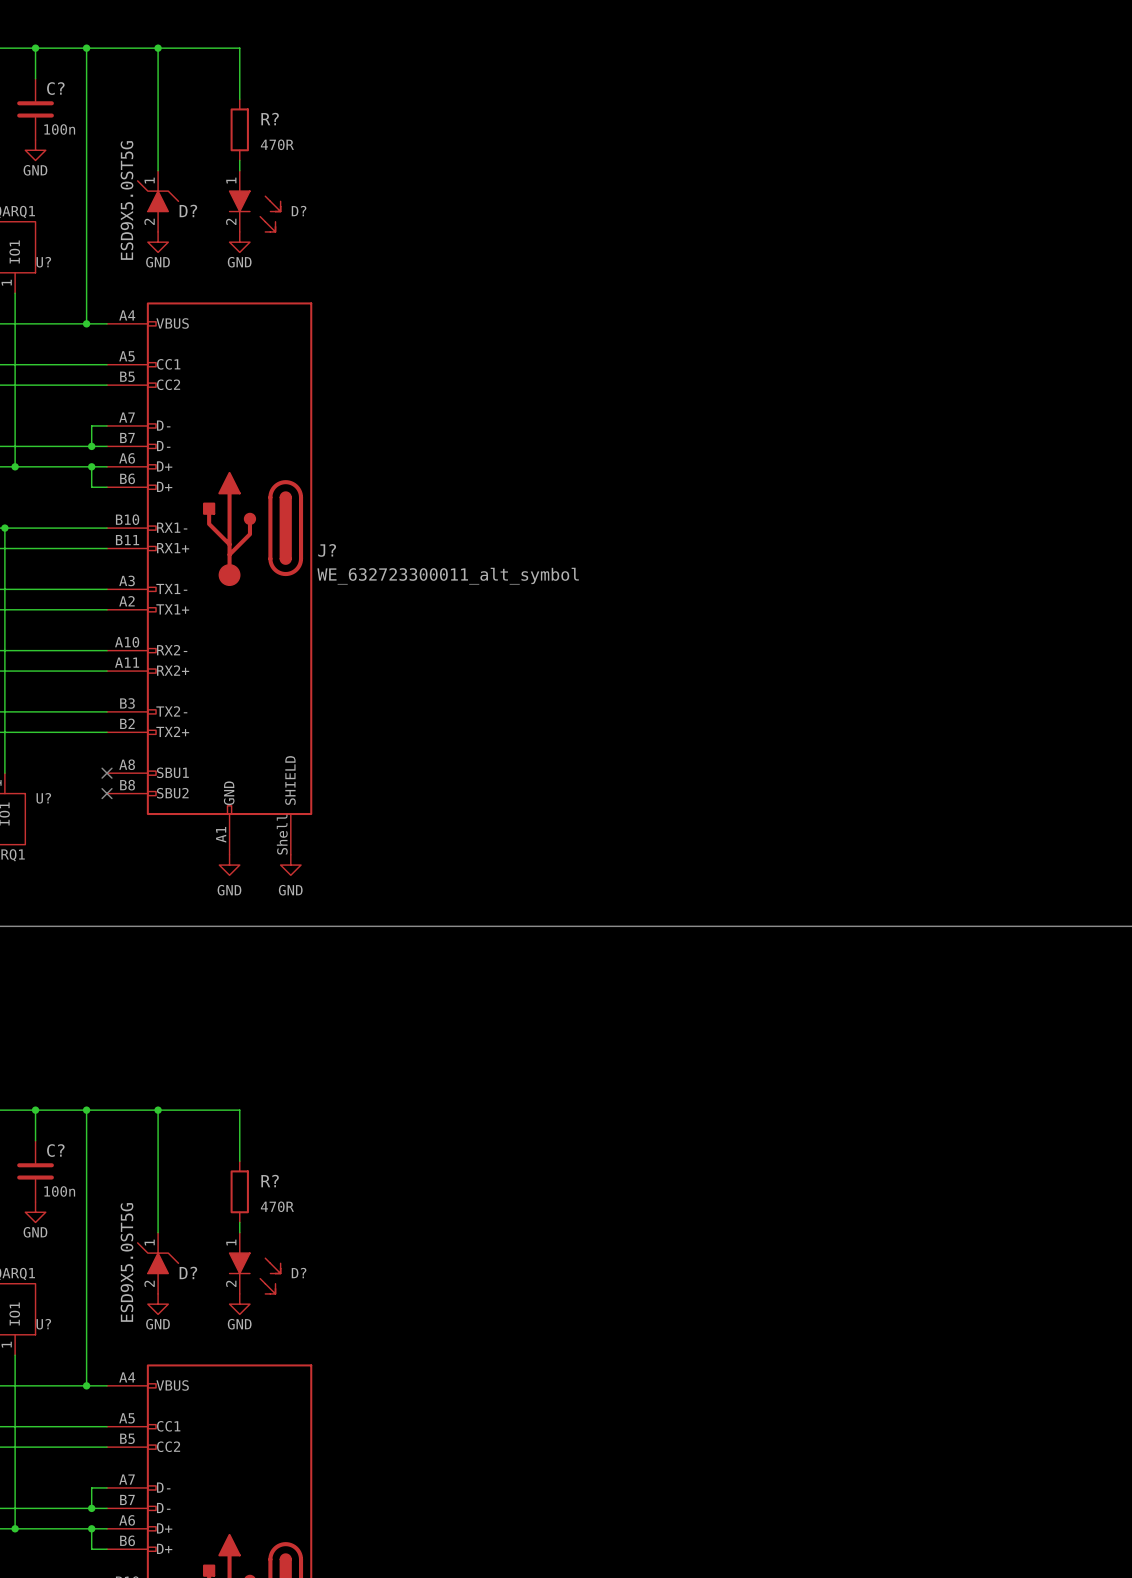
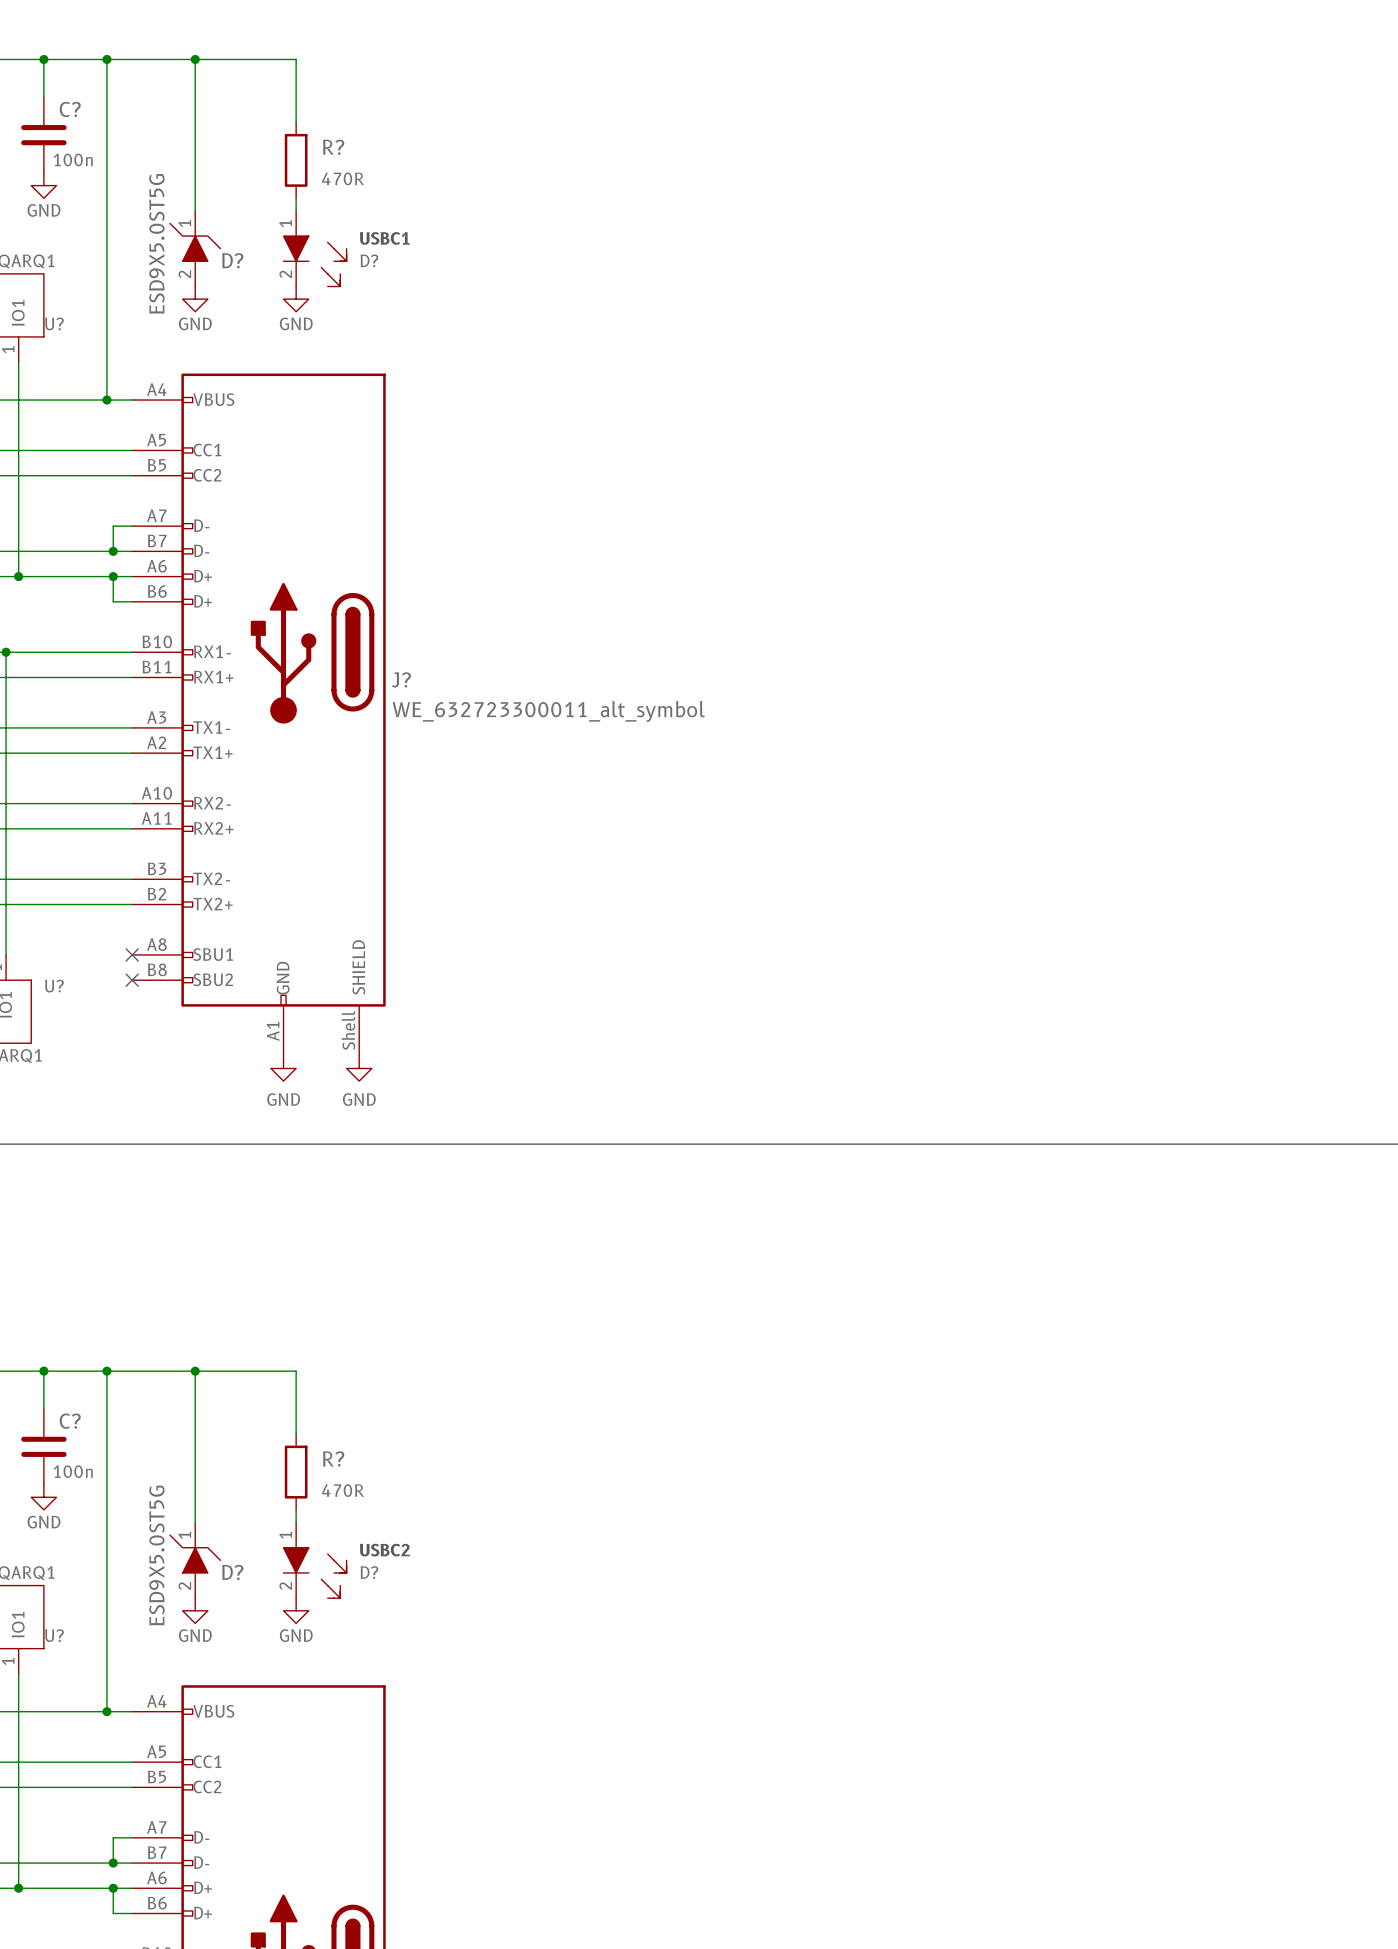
text: none -> USBC1 (384, 238)
text: none -> USBC2 (384, 1550)

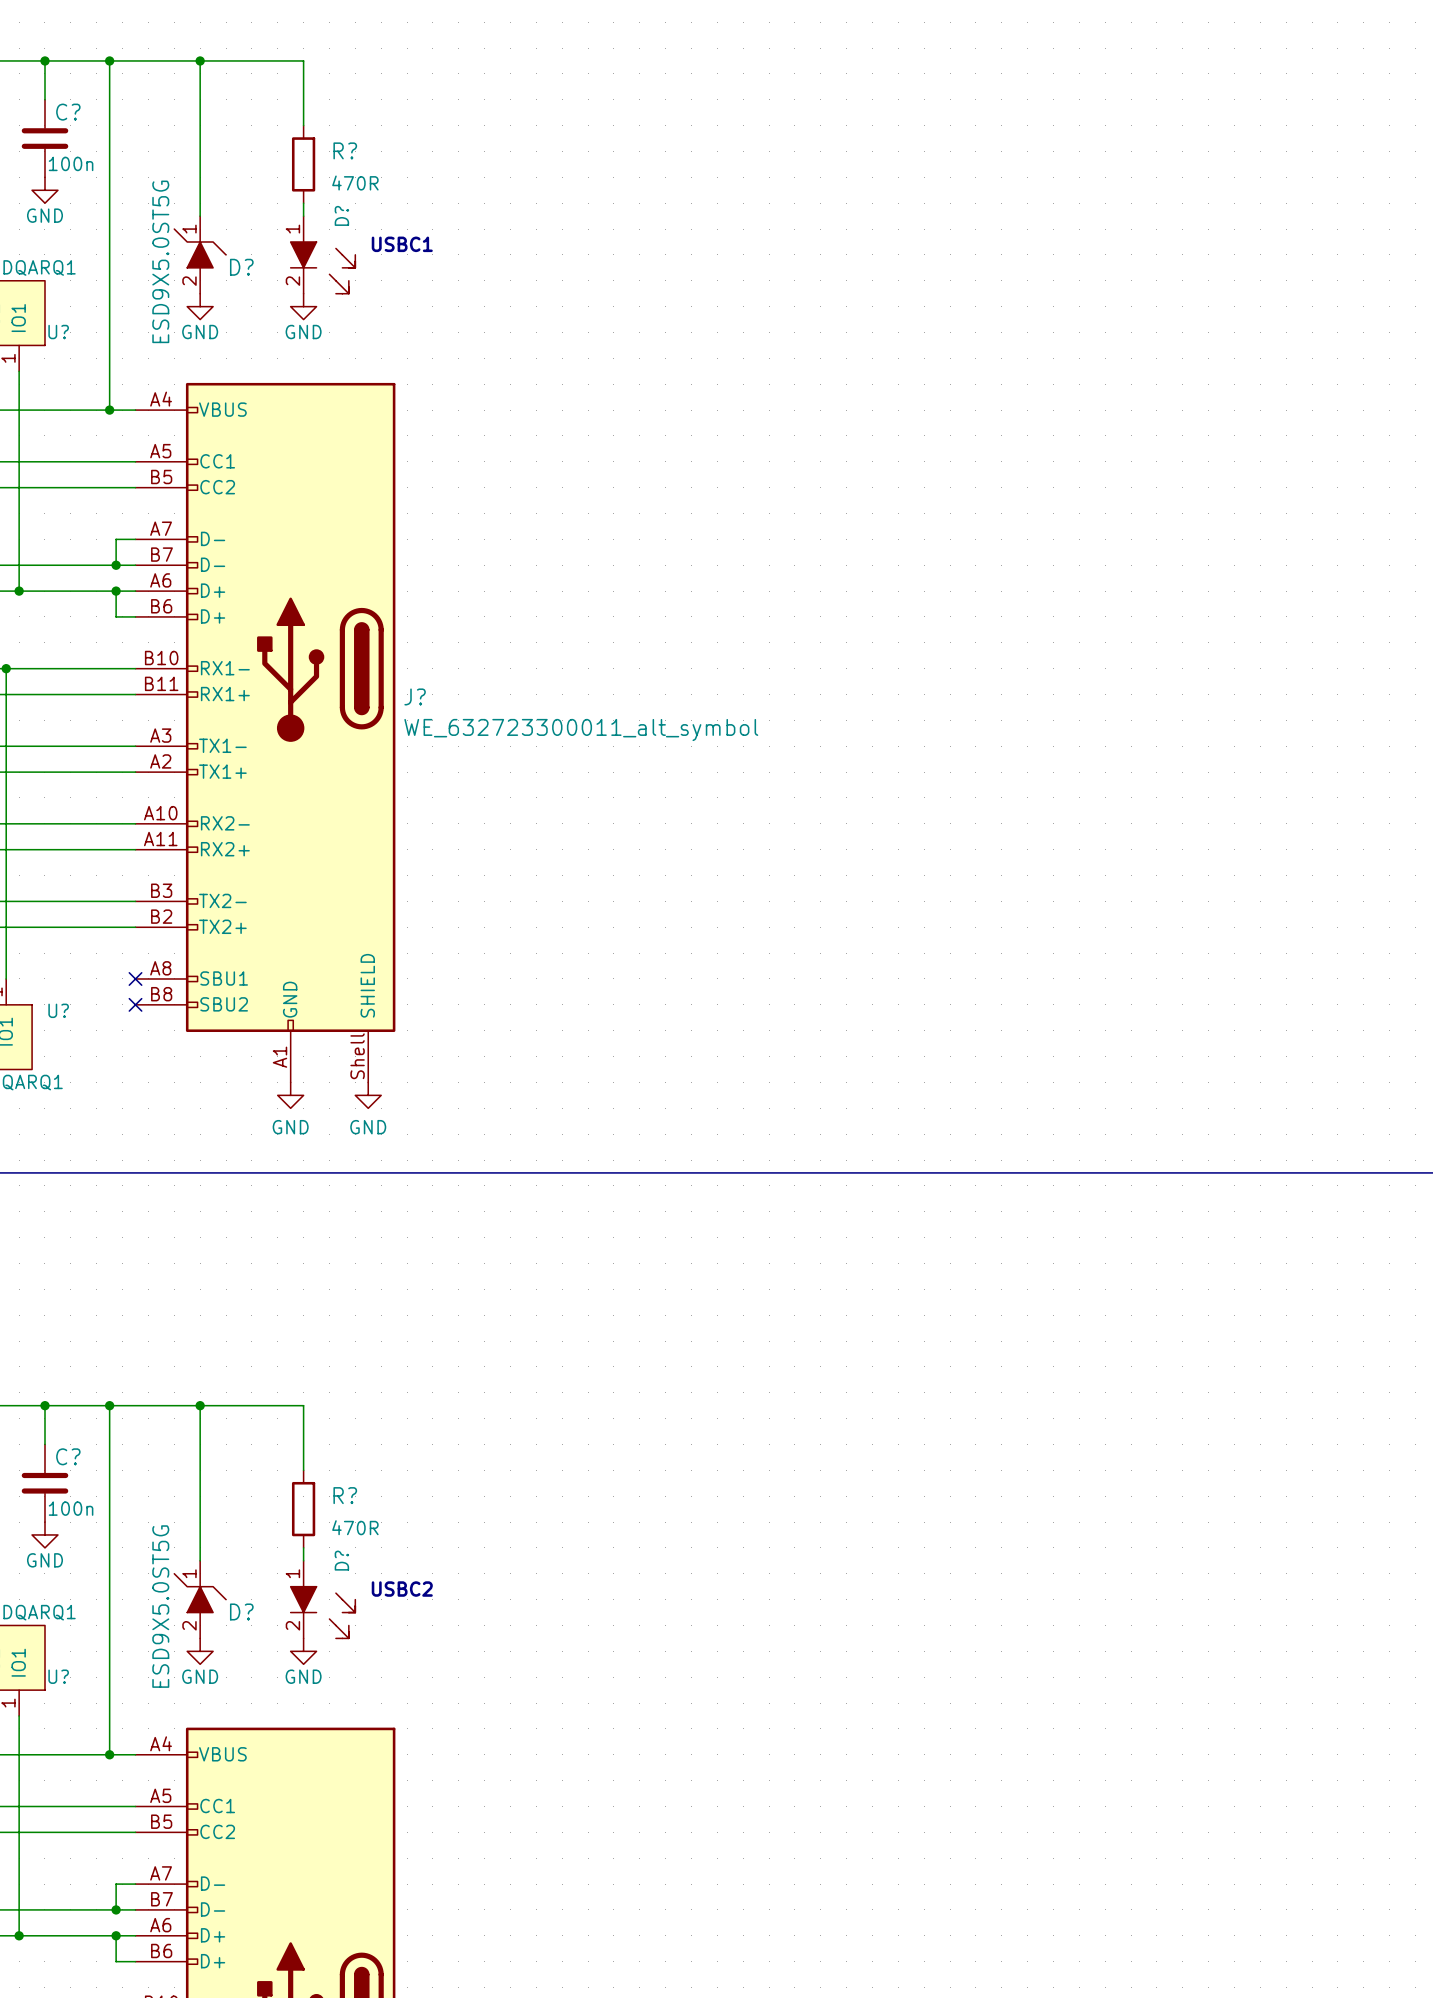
D? name rotation: 0° (369, 260) -> 90° counterclockwise (341, 215)
D? name position: D? (369, 260) -> D? (341, 215)
D? name rotation: 0° (369, 1572) -> 90° counterclockwise (341, 1560)
D? name position: D? (369, 1572) -> D? (341, 1560)

